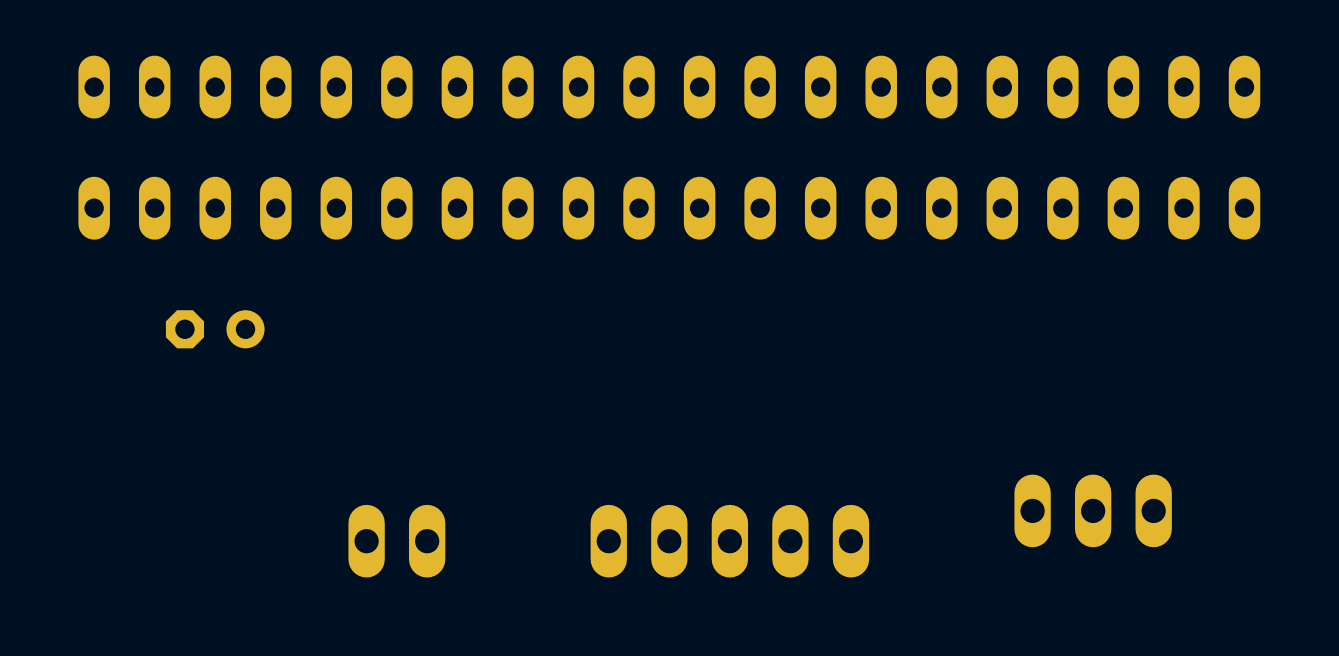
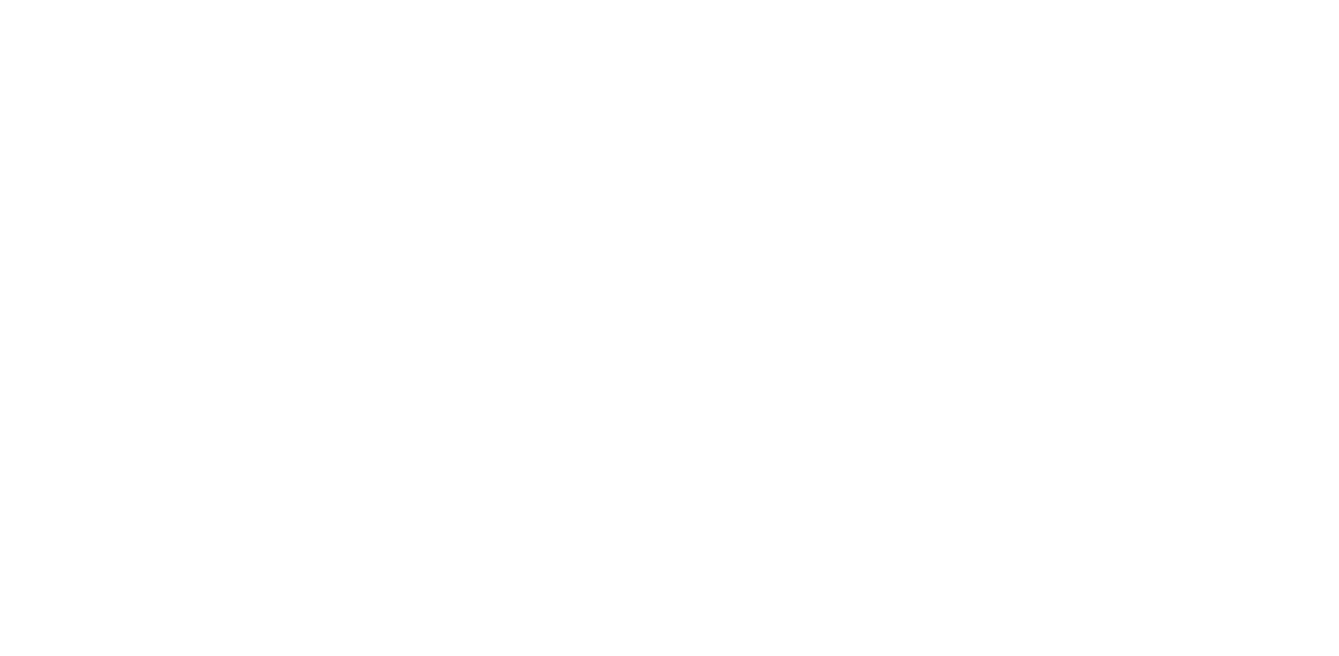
part: (669, 87) -> none
part: (669, 208) -> none
part: (215, 329) -> none
part: (1093, 510) -> none
part: (396, 541) -> none
part: (729, 541) -> none

